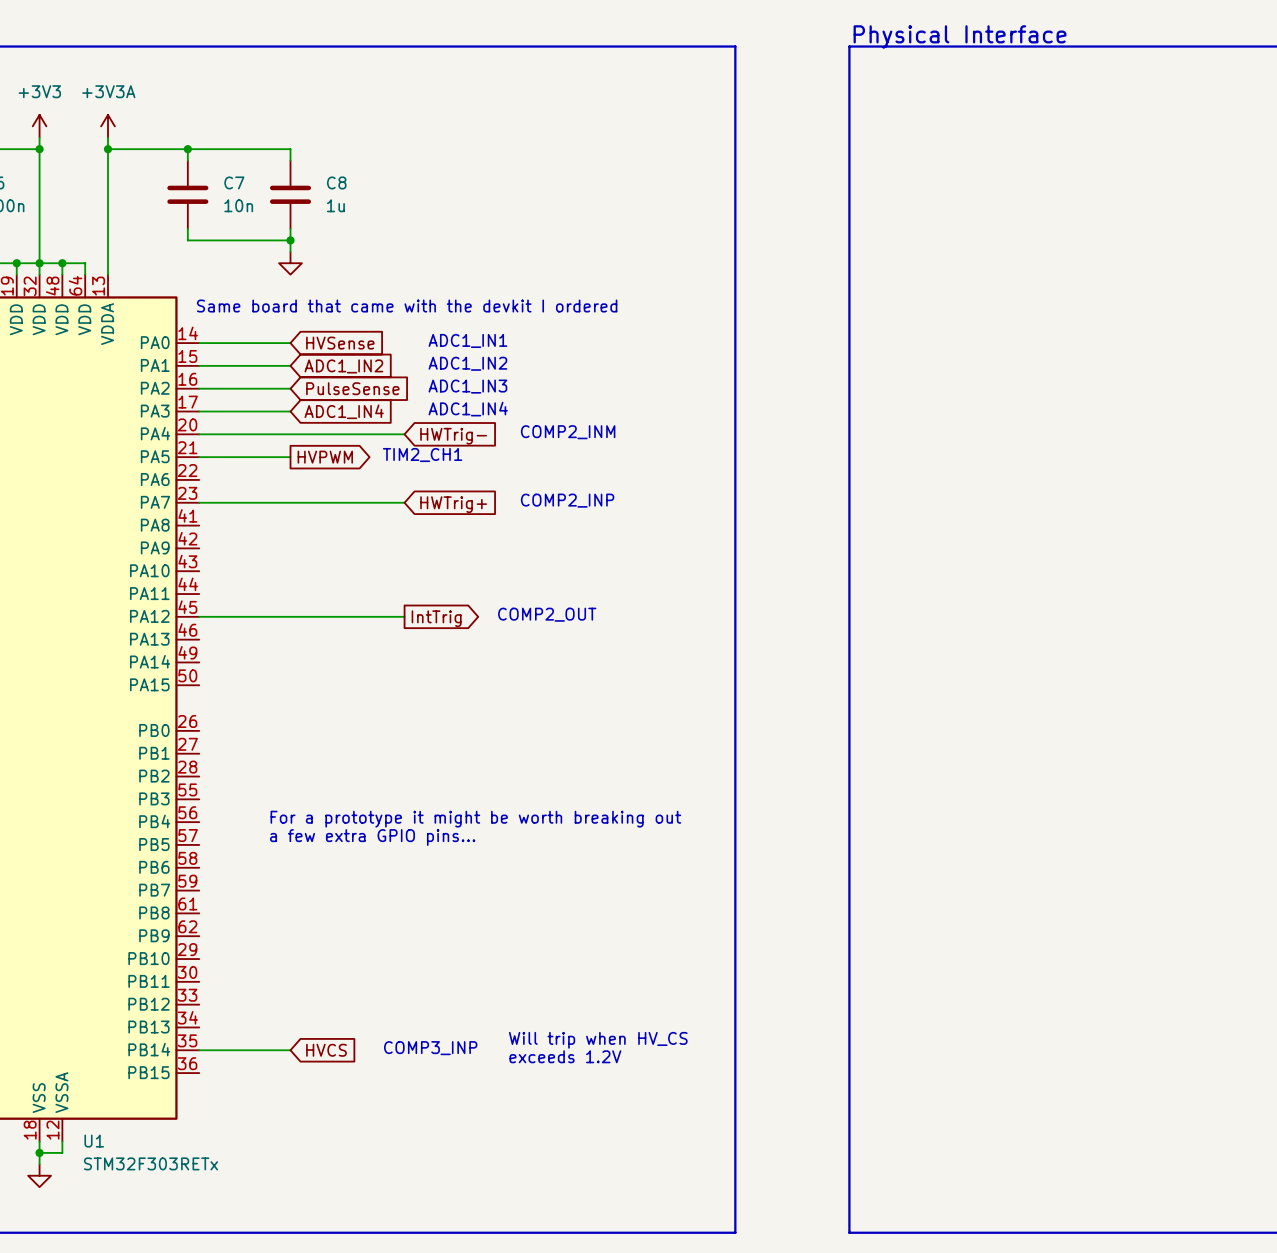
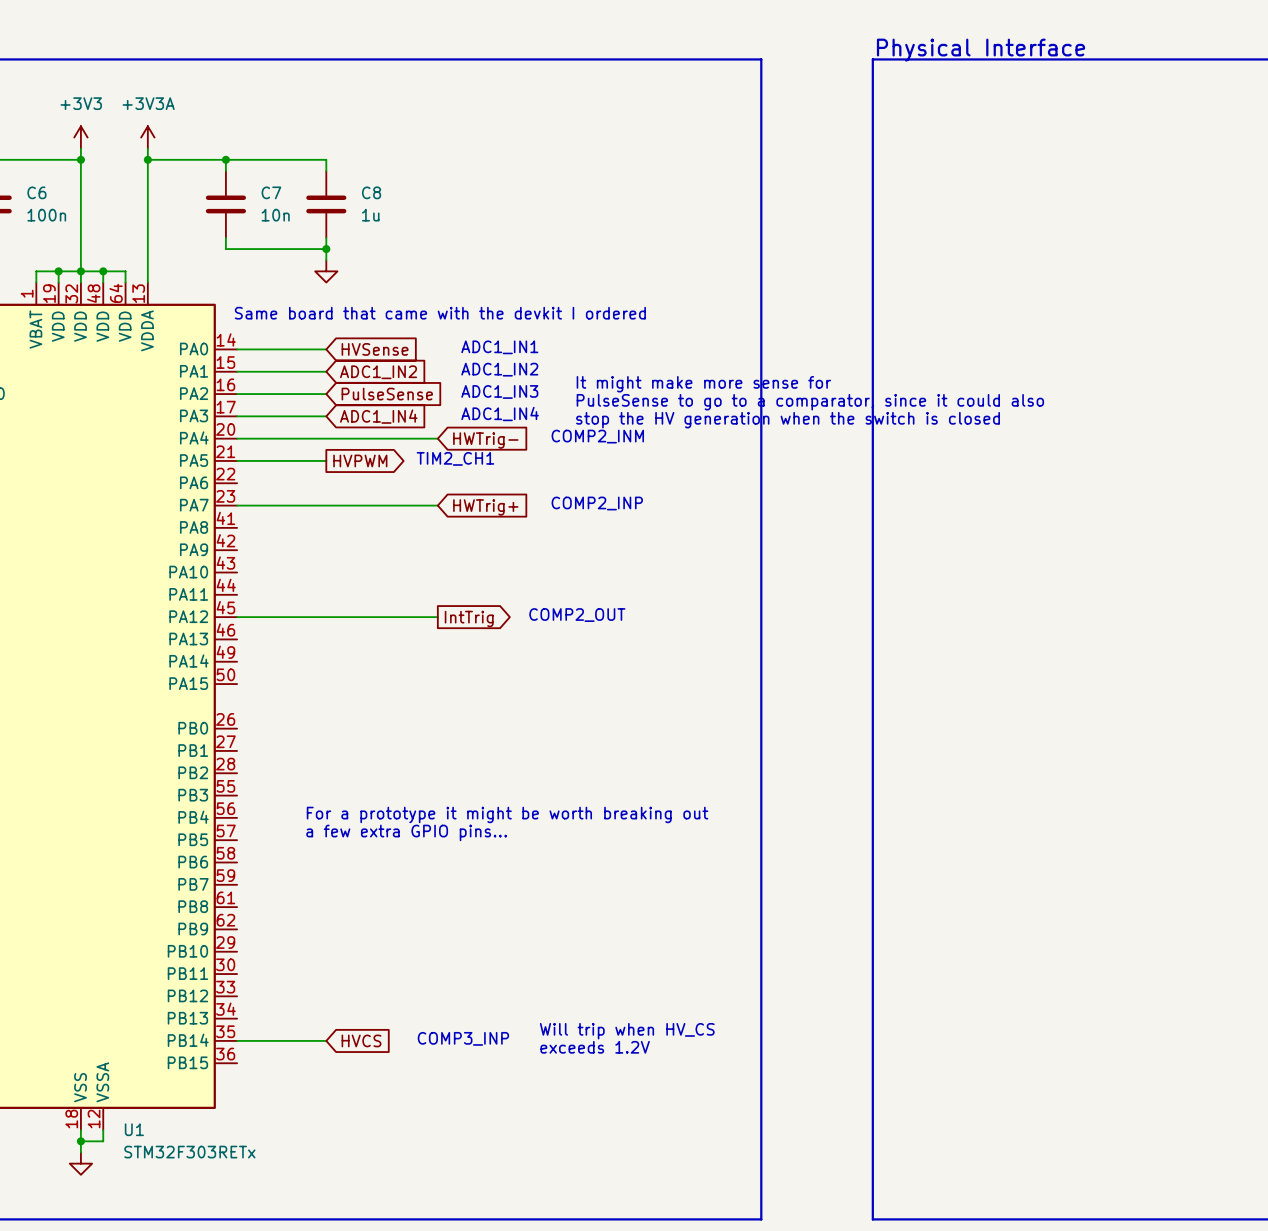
text: none -> It might make more sense for (703, 384)
text: none -> PulseSense to go to a comparator, since it could also (810, 402)
text: none -> stop the HV generation when the switch is closed (788, 420)

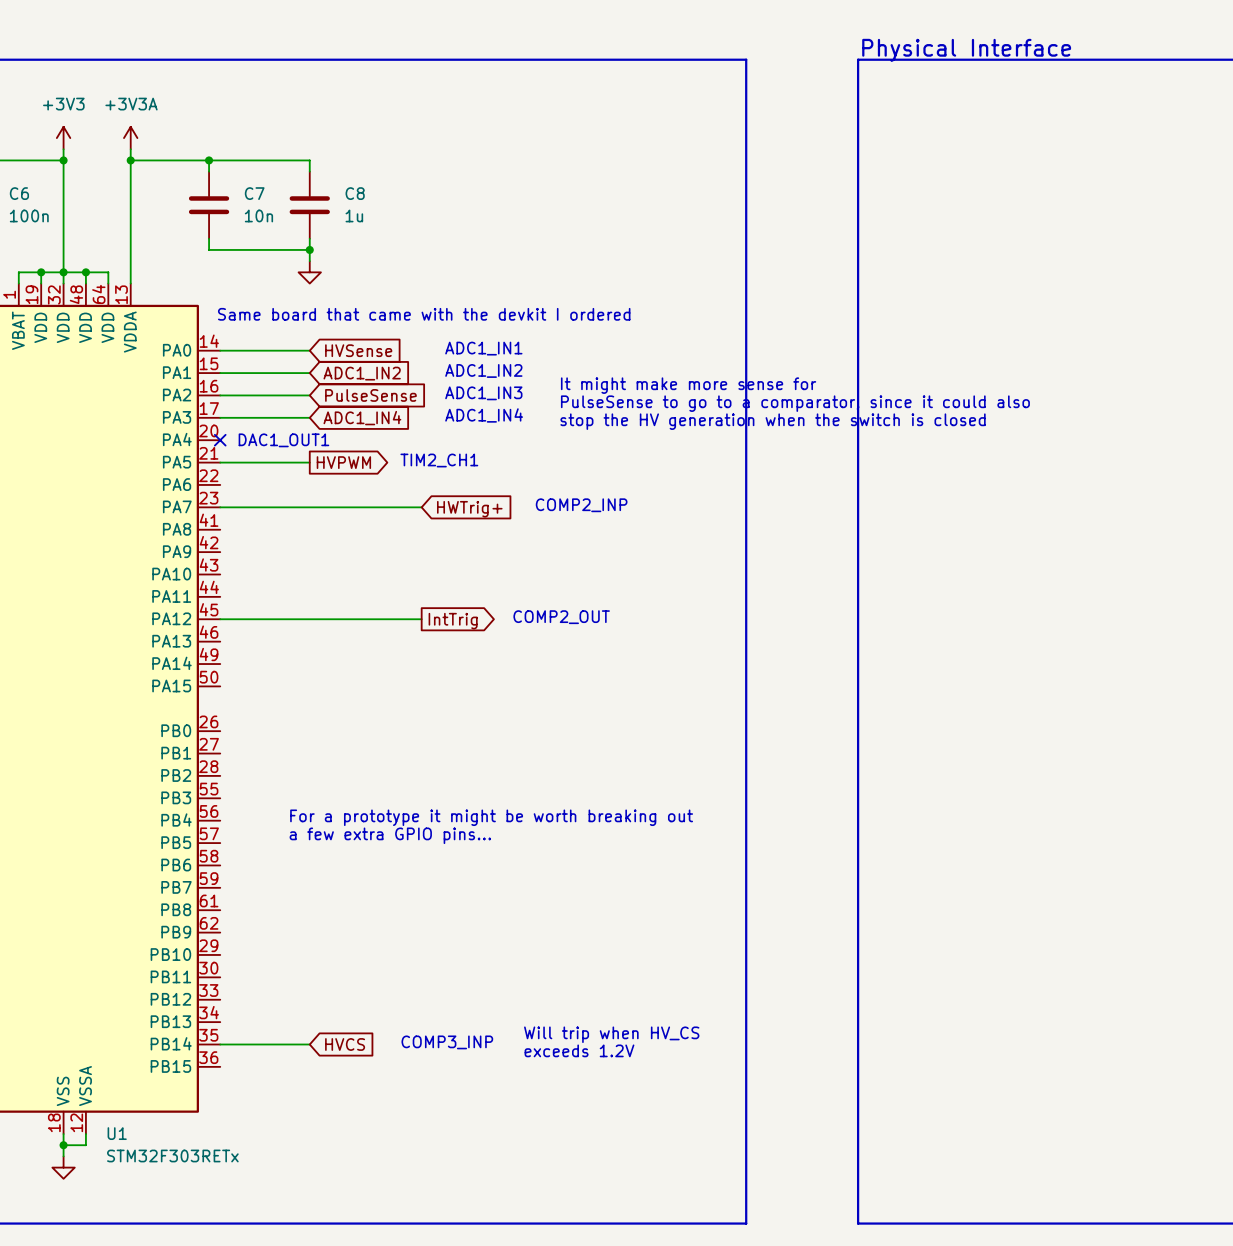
text: COMP2_INM (597, 436) -> none
wire: (237, 438) (437, 438) -> none
no-connect mark: none -> (220, 440)
text: none -> DAC1_OUT1 (283, 440)
global label: HWTrig- (485, 440) -> none

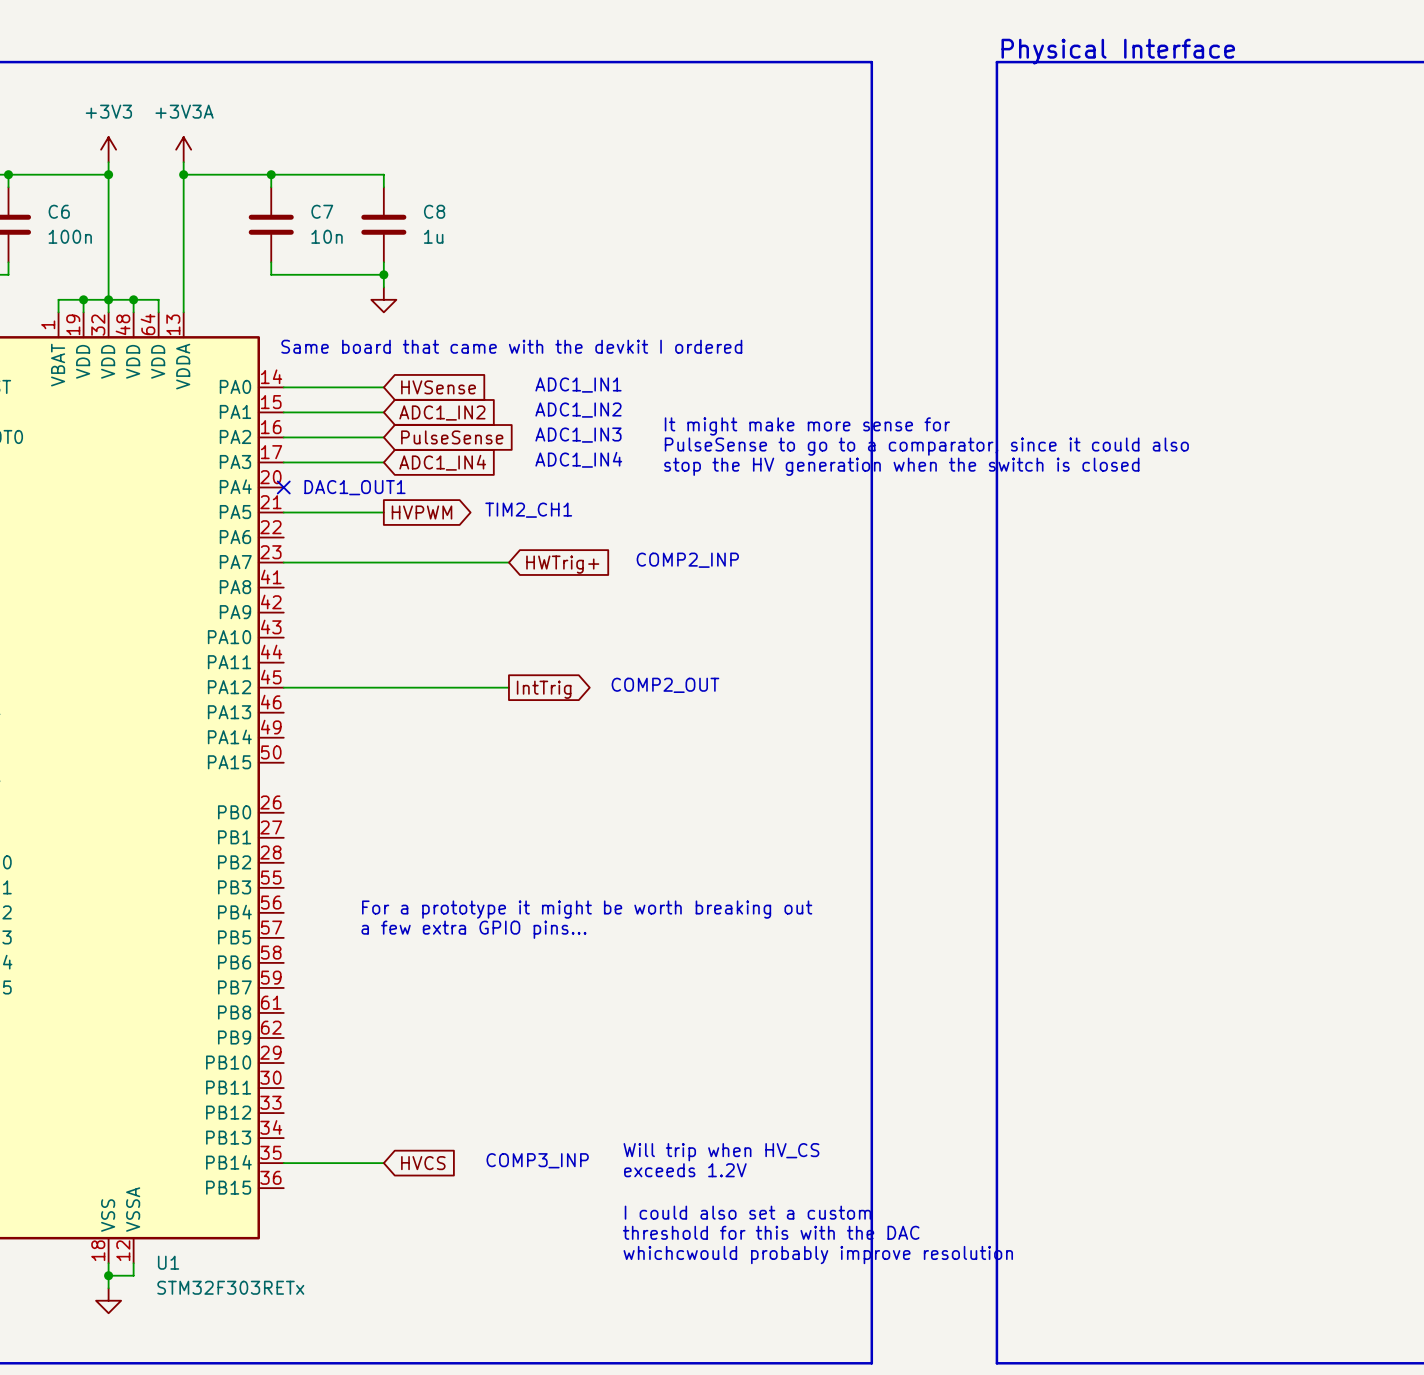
text: none -> I could also set a custom (747, 1212)
text: none -> threshold for this with the DAC (771, 1232)
text: none -> whichcwould probably improve resolution (818, 1255)

